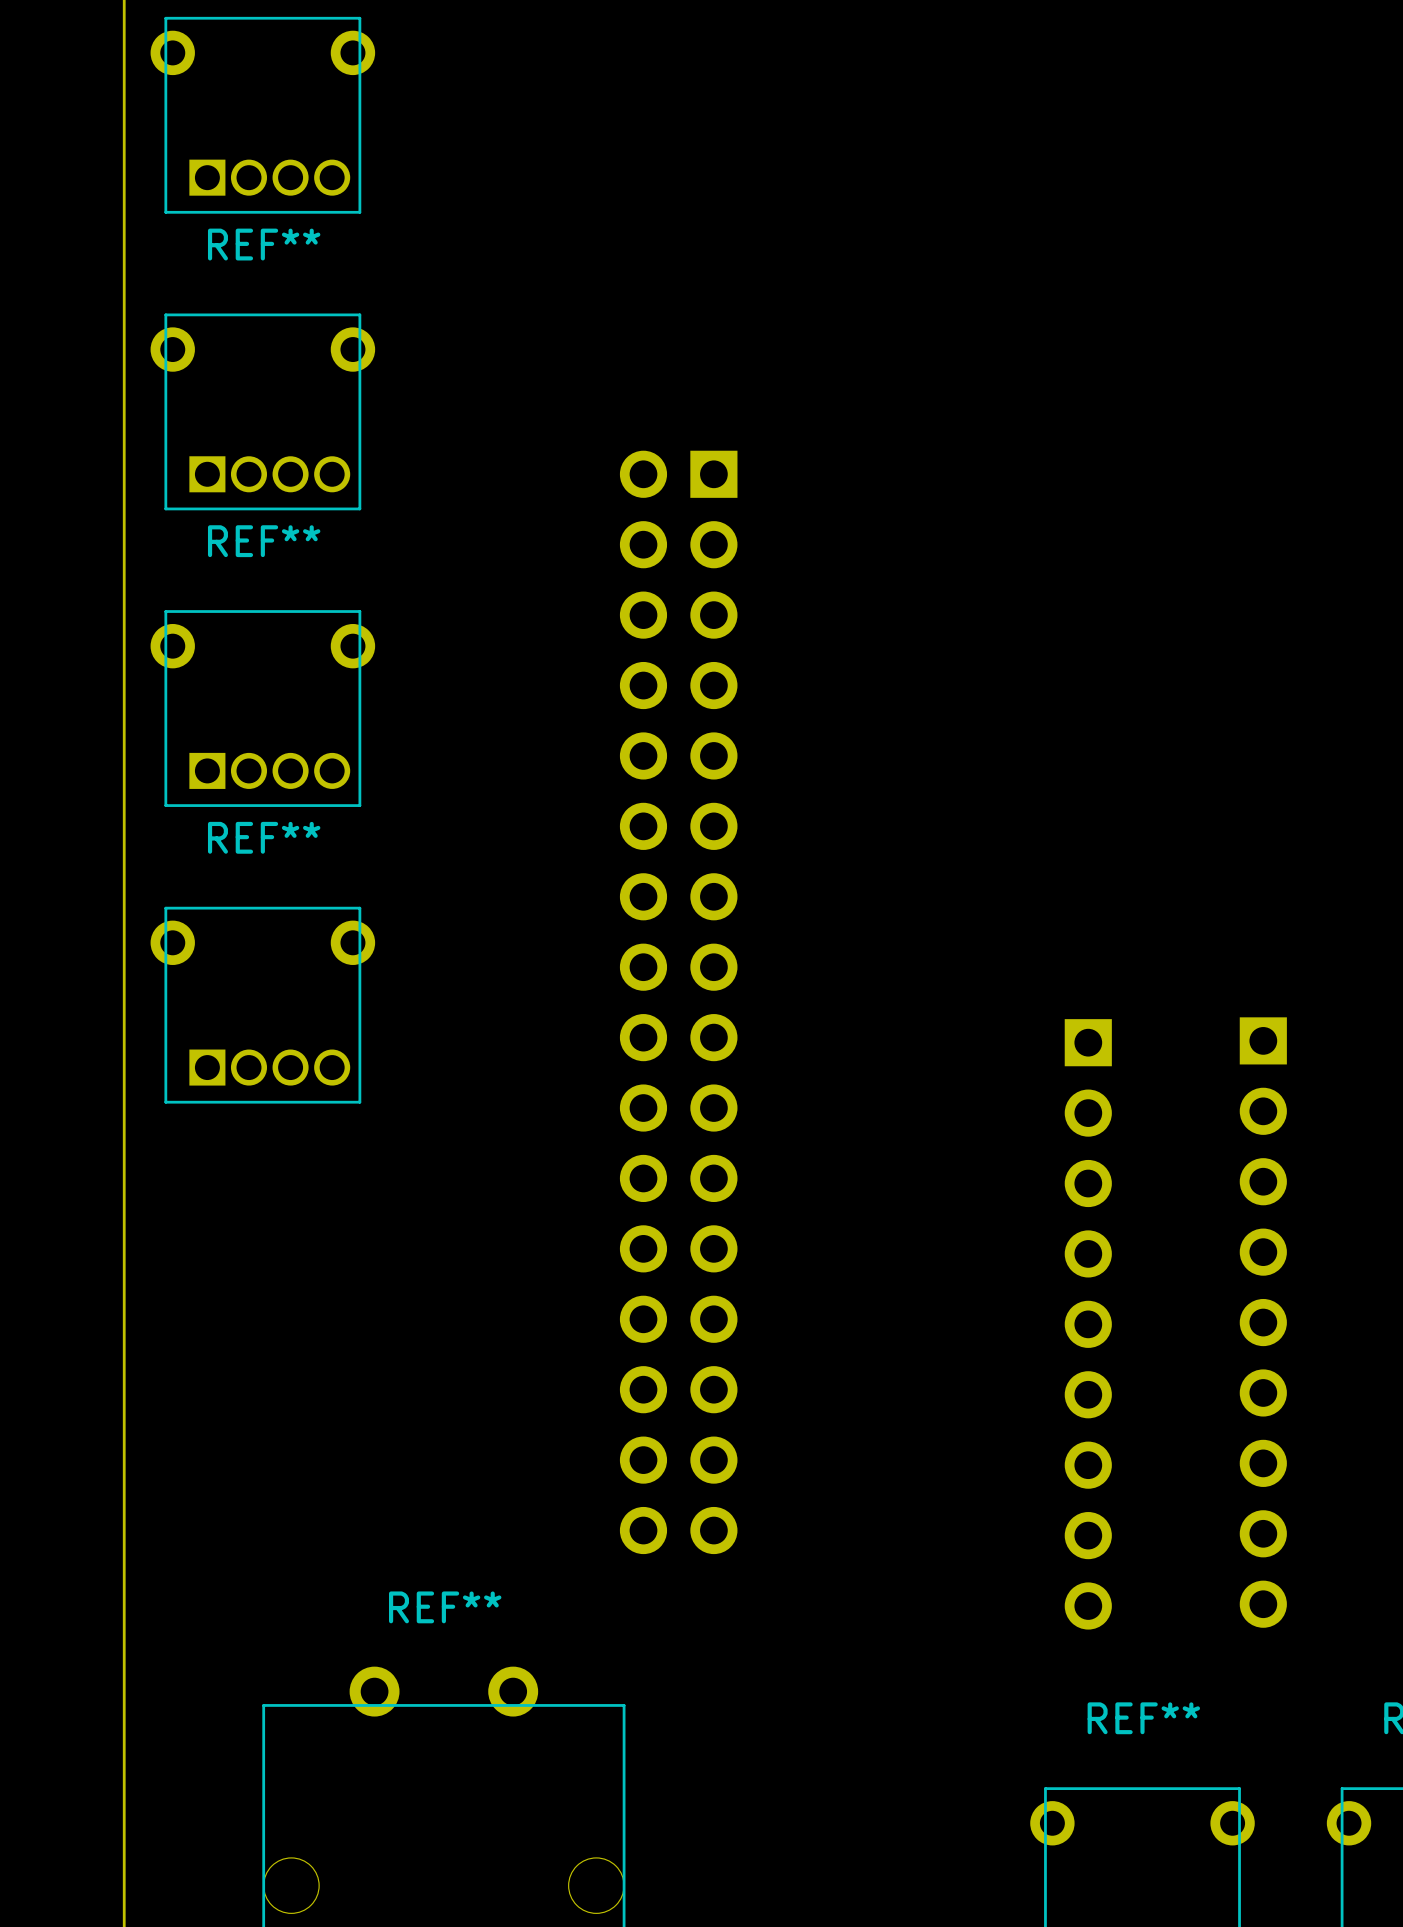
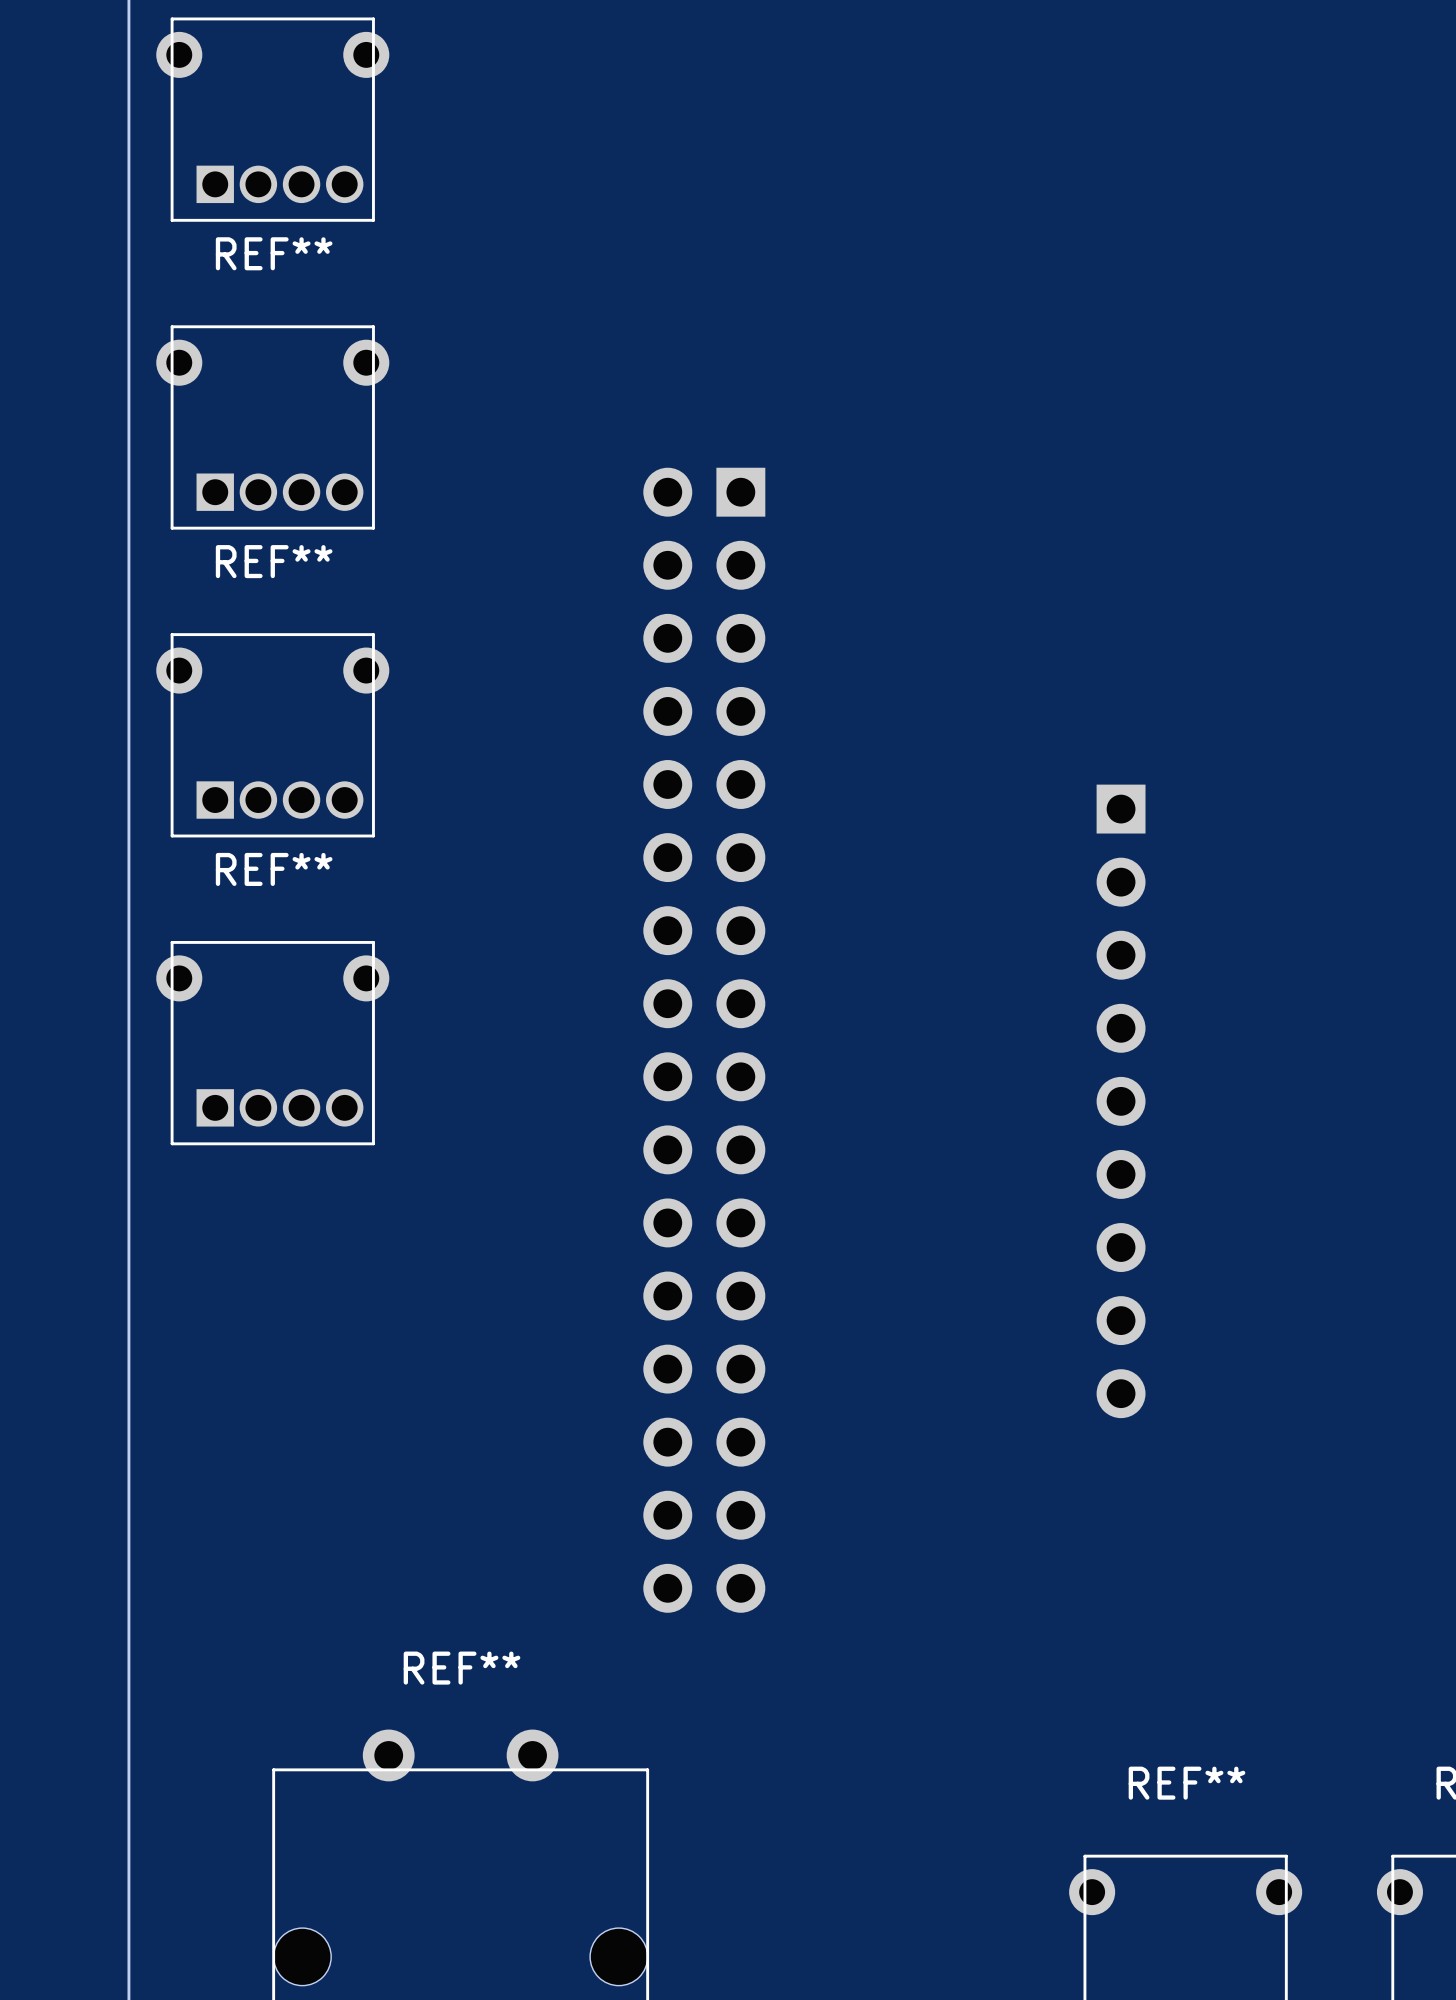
part: none -> (1121, 1101)
part: (1263, 1322) -> none
part: (1088, 1324) -> none

